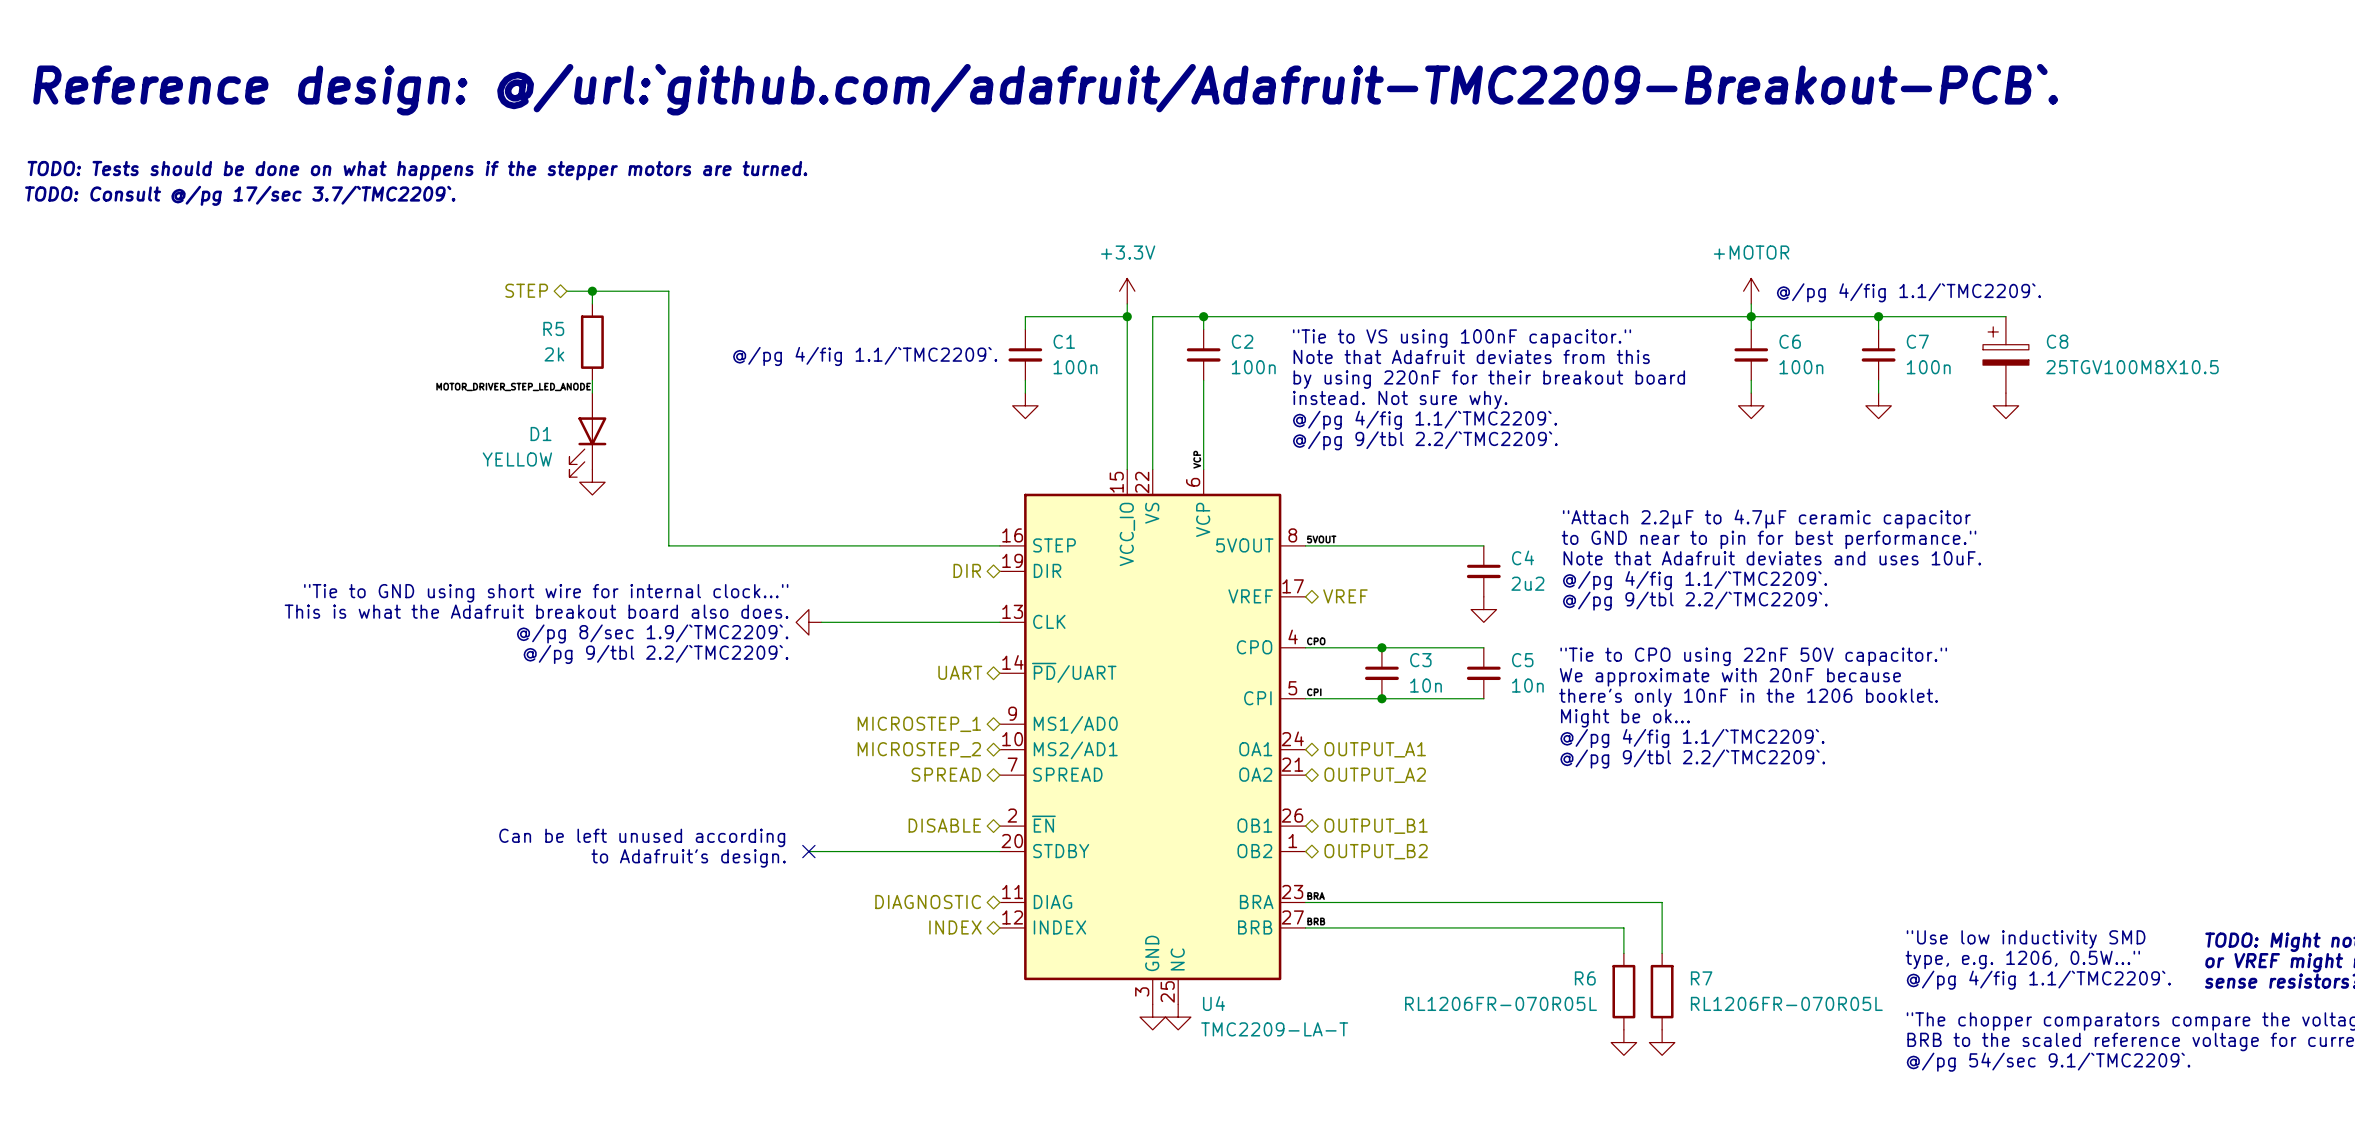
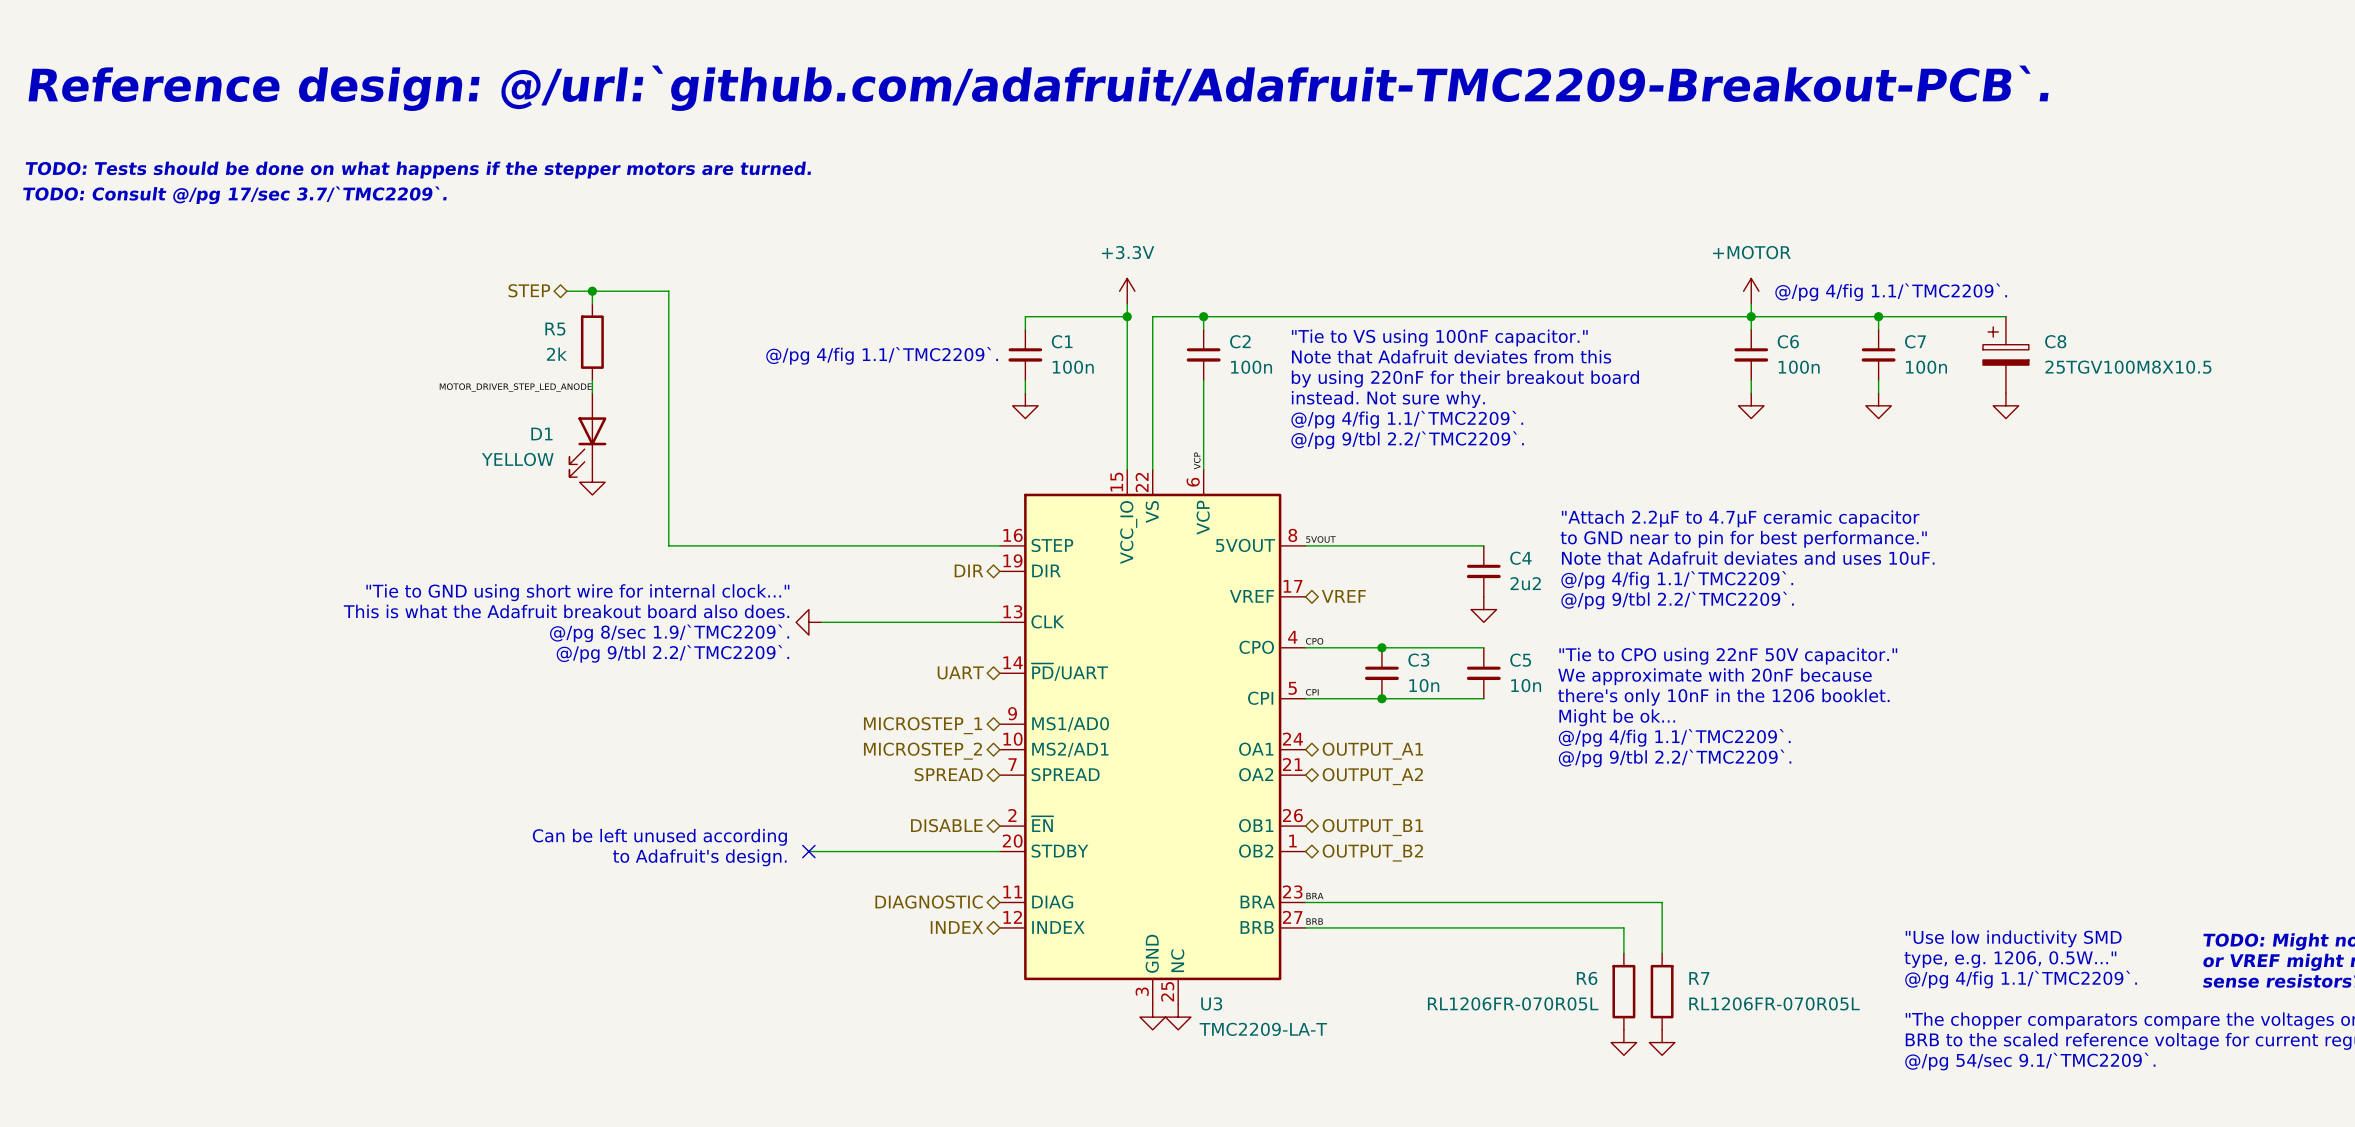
U4 name: U4 (1214, 1003) -> U3 (1211, 1003)

